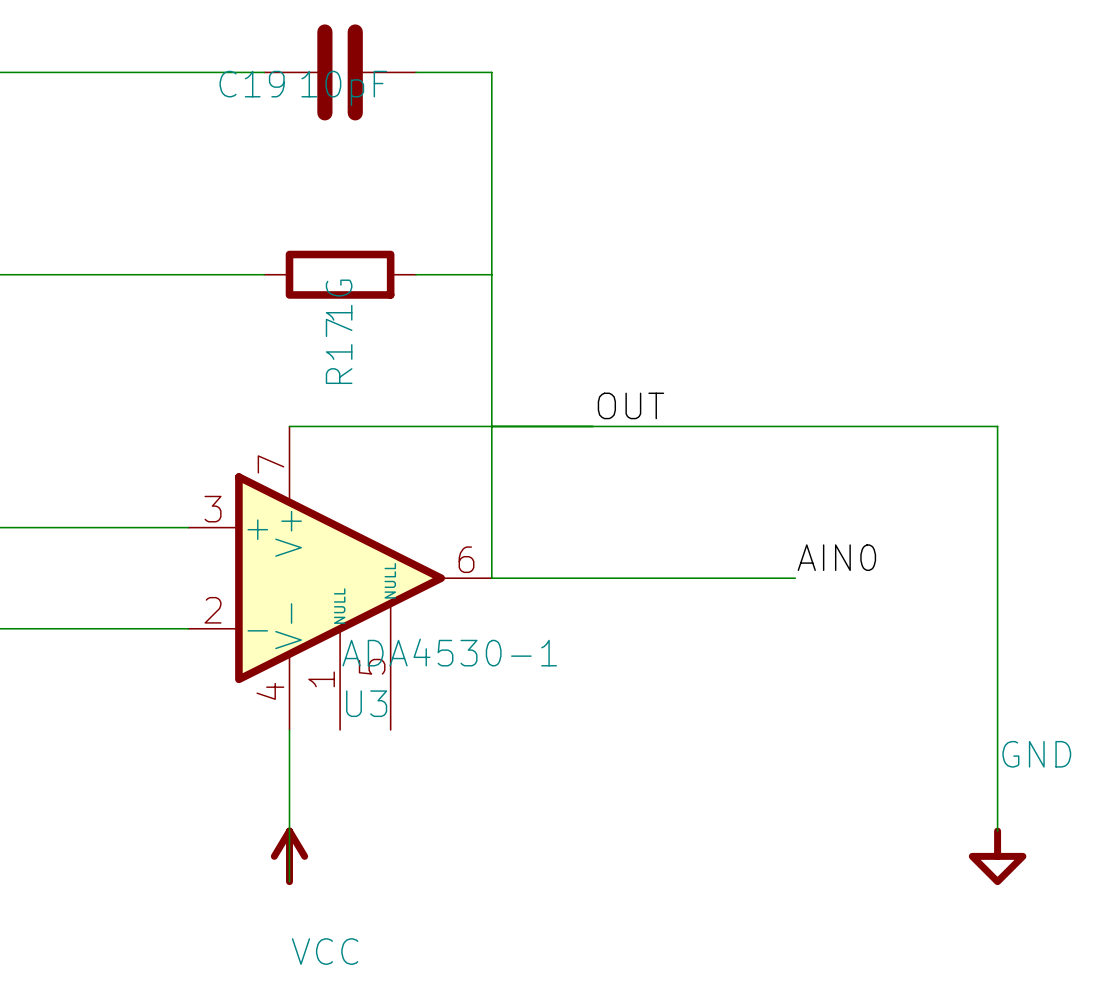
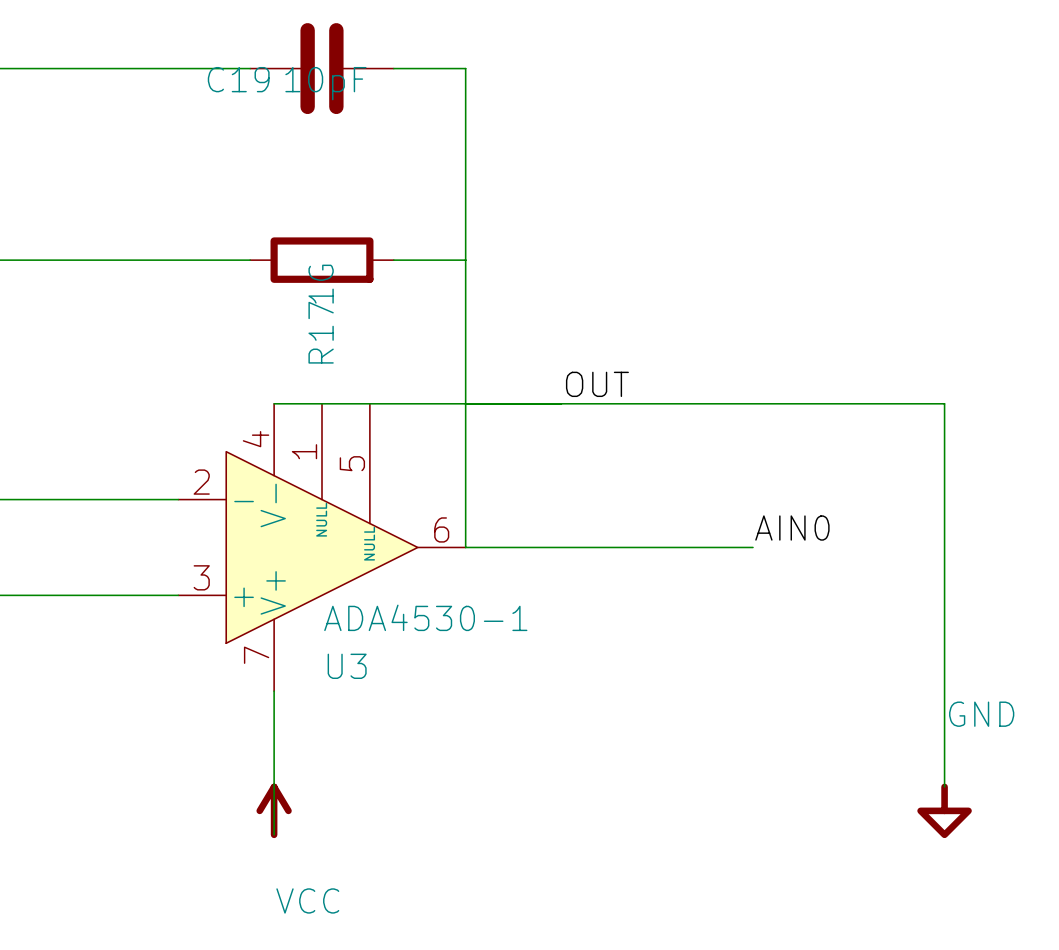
U3 symbol: [188, 426, 492, 730] -> [178, 403, 466, 692]

